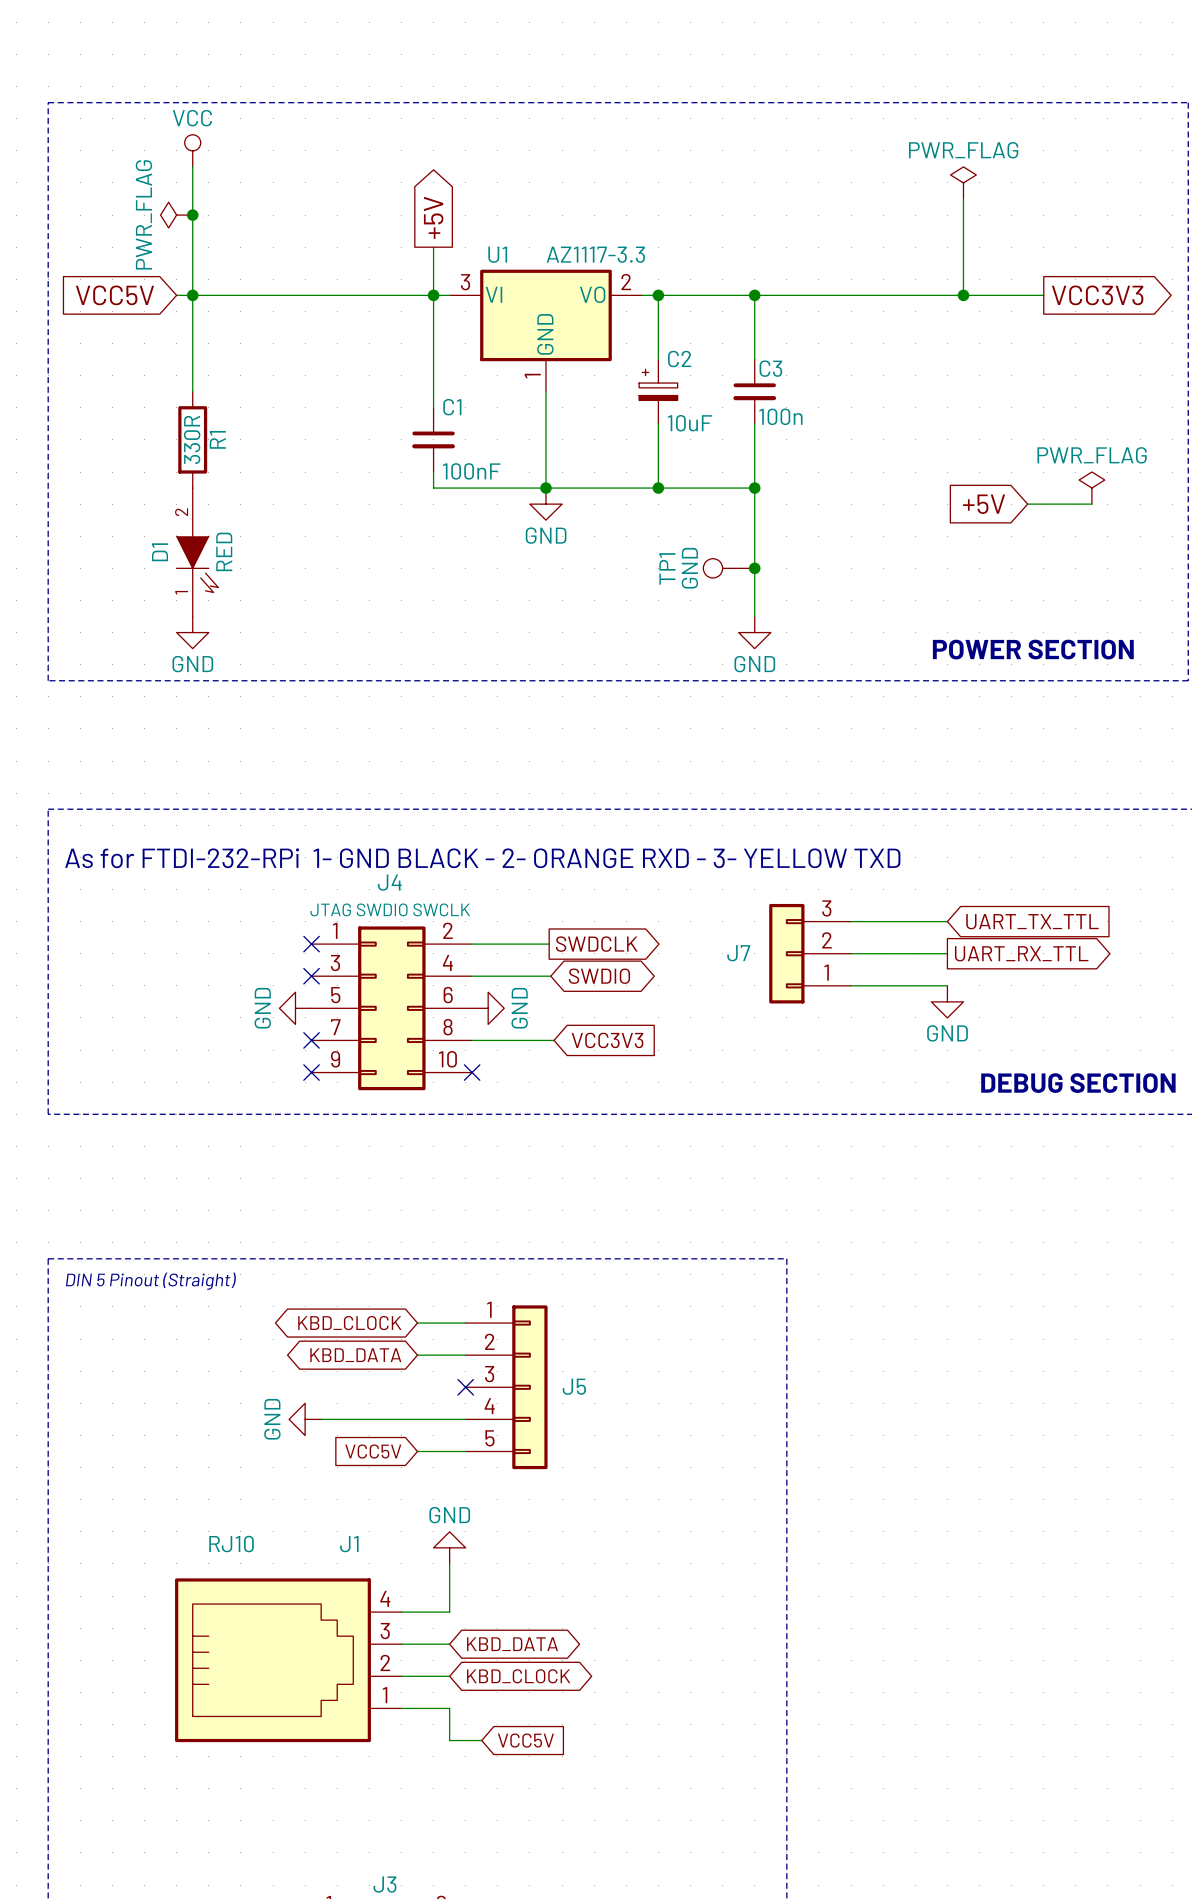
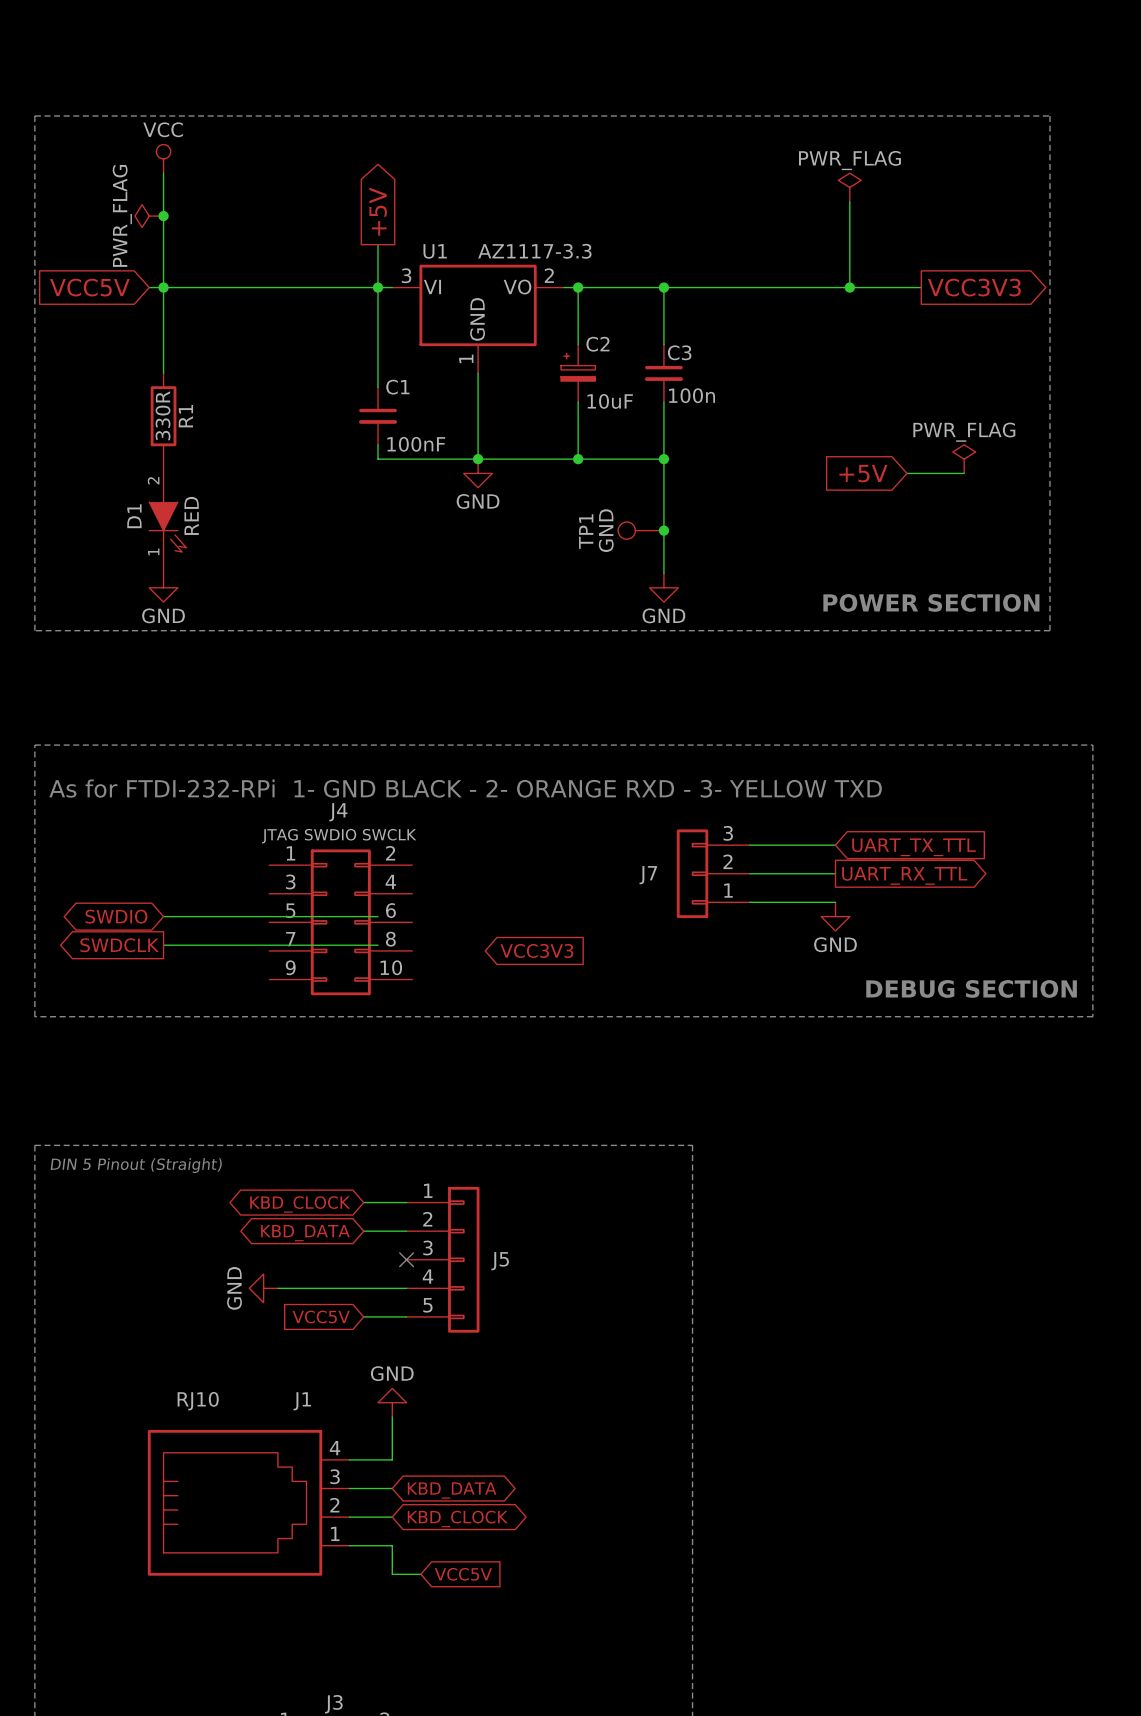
no-connect mark: (311, 944) -> none
wire: (472, 944) (549, 944) -> none
global label: SWDCLK (596, 944) -> none
no-connect mark: (311, 976) -> none
wire: (472, 976) (550, 976) -> none
global label: SWDIO (599, 976) -> none
global label: none -> SWDIO (116, 916)
wire: none -> (163, 916) (378, 916)
power symbol: GND (295, 1008) -> none
power symbol: GND (488, 1008) -> none
global label: none -> SWDCLK (119, 945)
wire: none -> (163, 945) (378, 945)
no-connect mark: (311, 1040) -> none
wire: (472, 1040) (554, 1040) -> none
no-connect mark: (311, 1072) -> none
no-connect mark: (472, 1072) -> none

